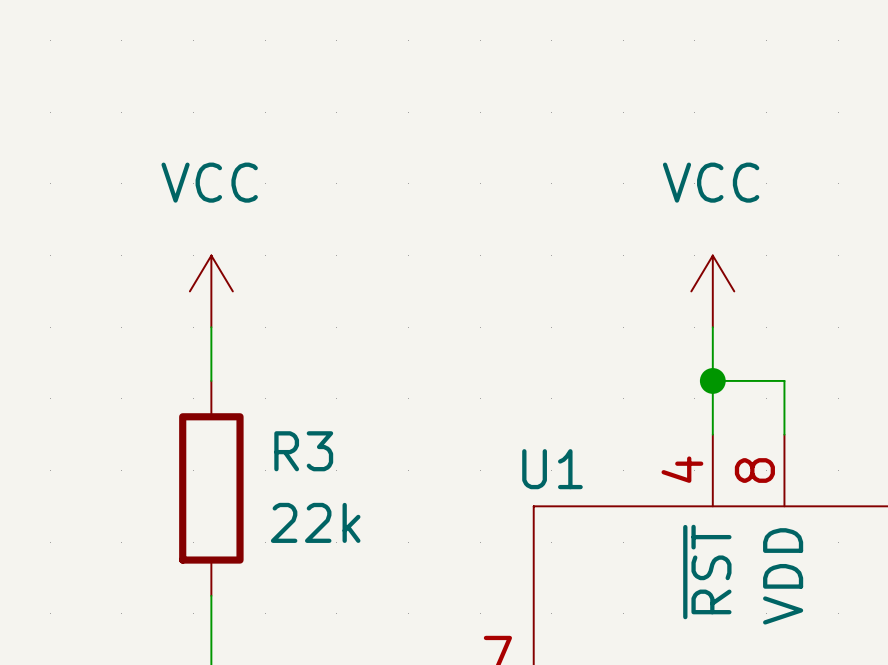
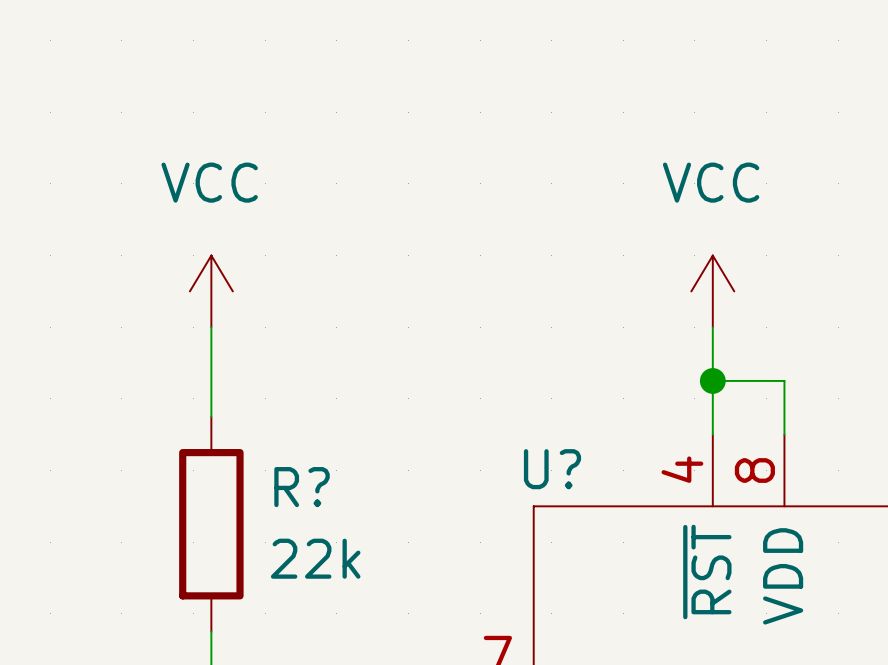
U1 name: U1 (552, 469) -> U? (552, 469)
R3: 22k (211, 488) -> none
R?: none -> 22k (211, 524)

